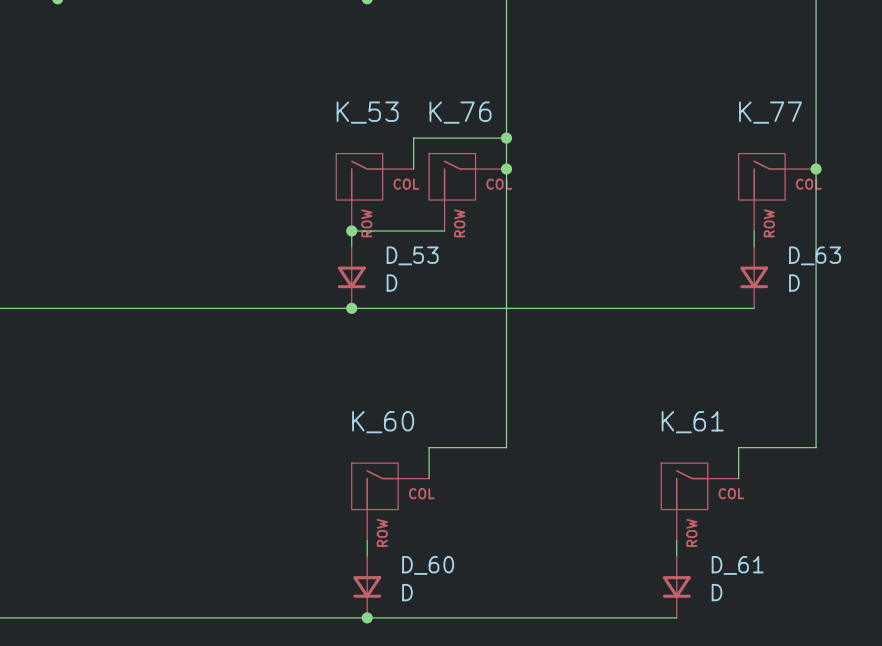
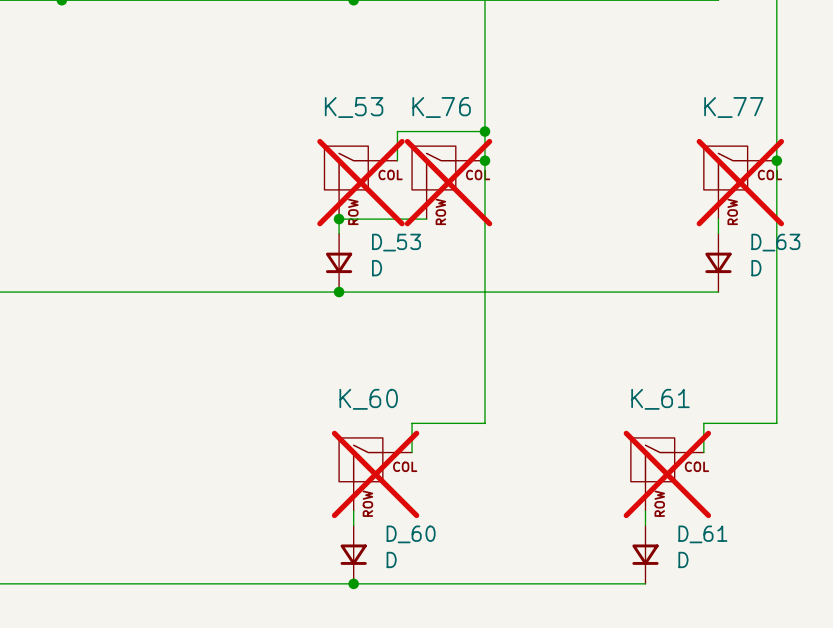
K_53 do-not-place cross: none -> (360, 182)
K_76 do-not-place cross: none -> (448, 182)
K_77 do-not-place cross: none -> (740, 182)
K_60 do-not-place cross: none -> (375, 474)
K_61 do-not-place cross: none -> (667, 474)

